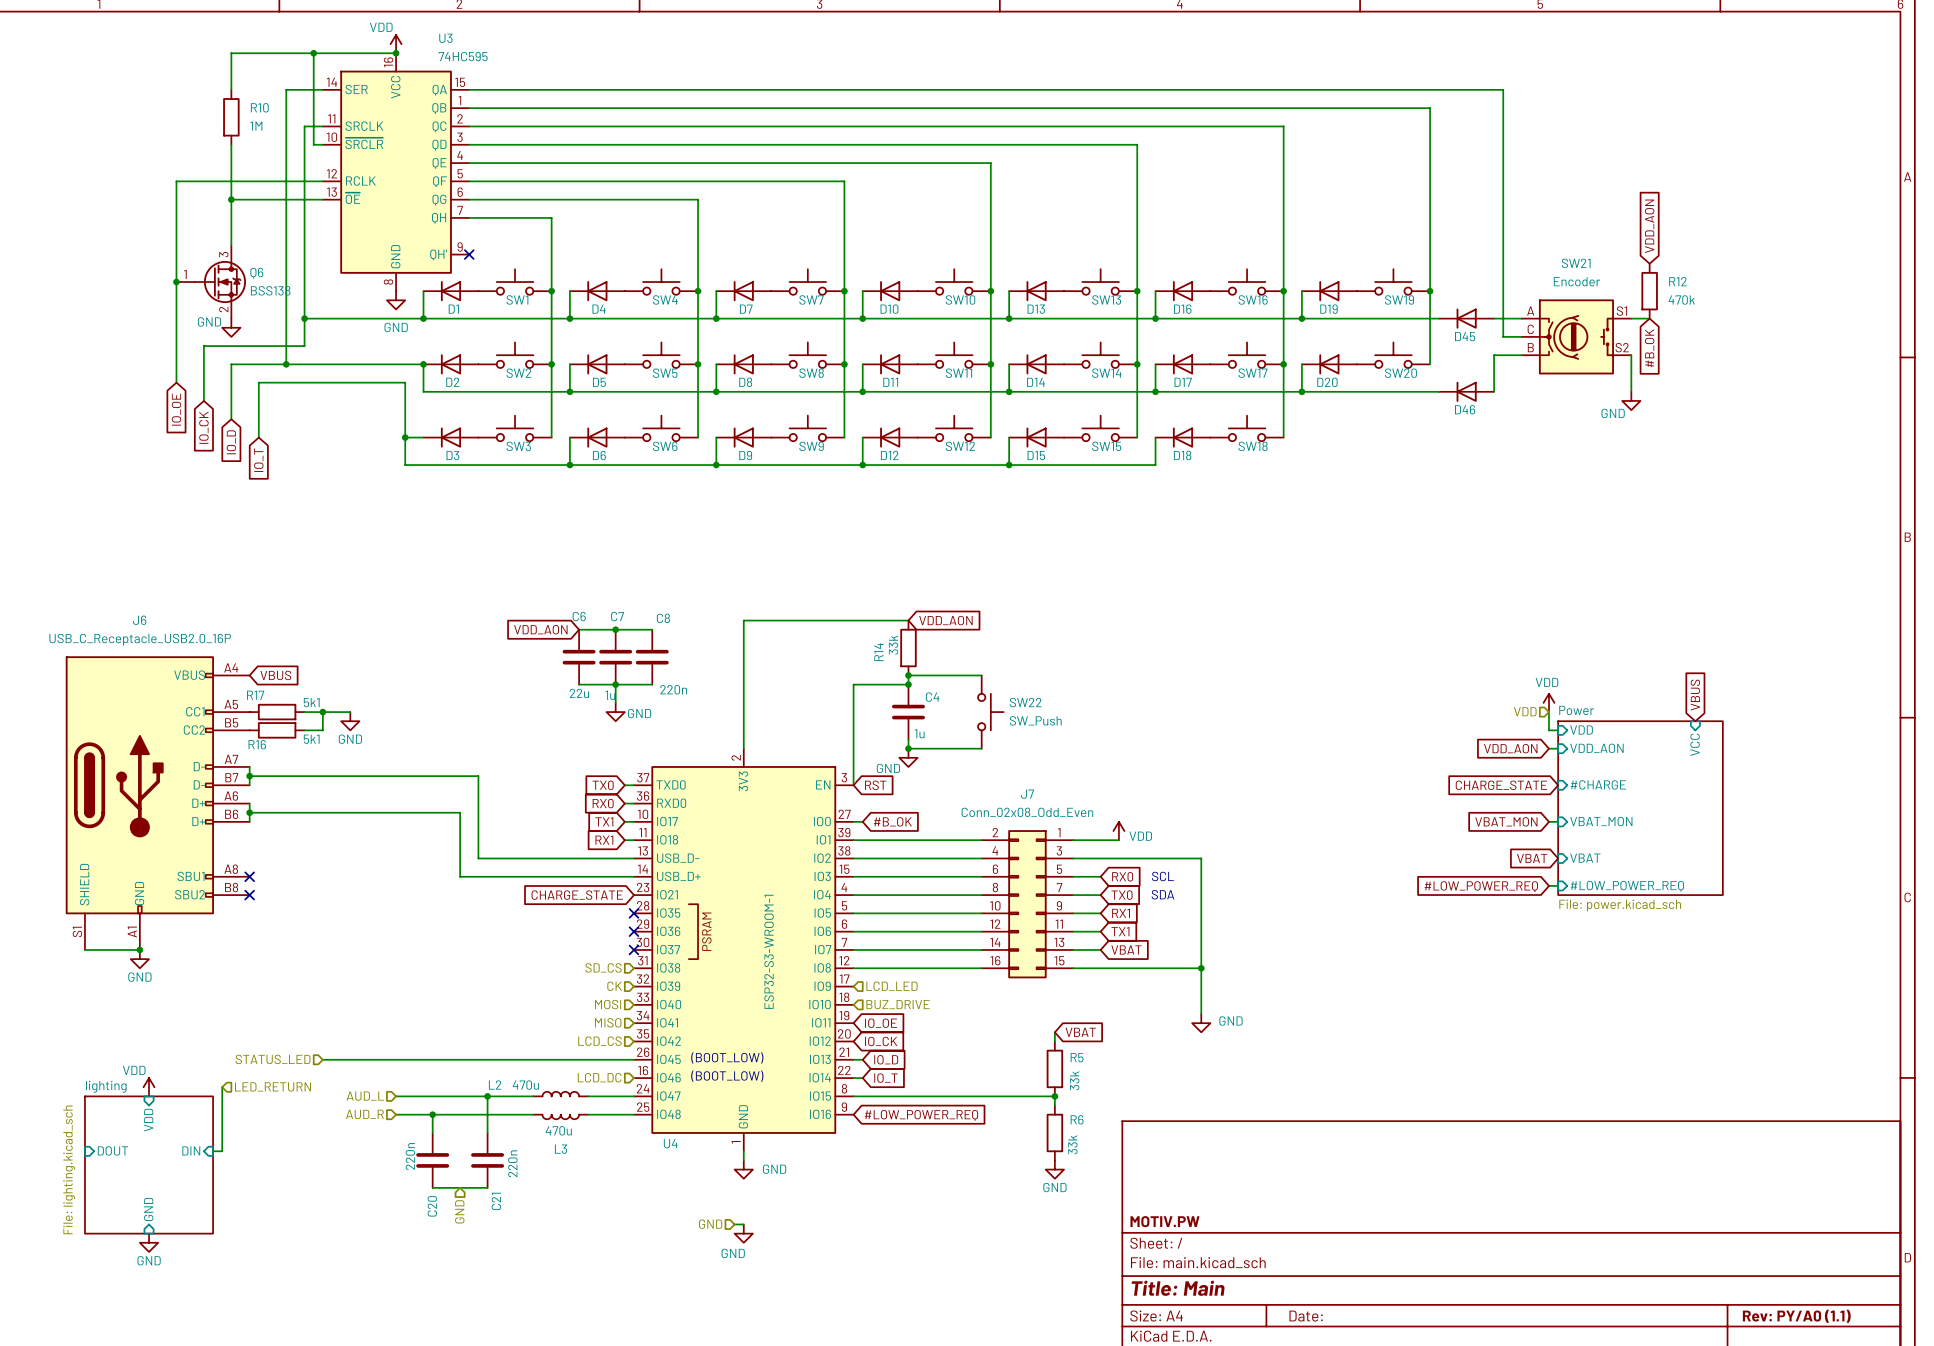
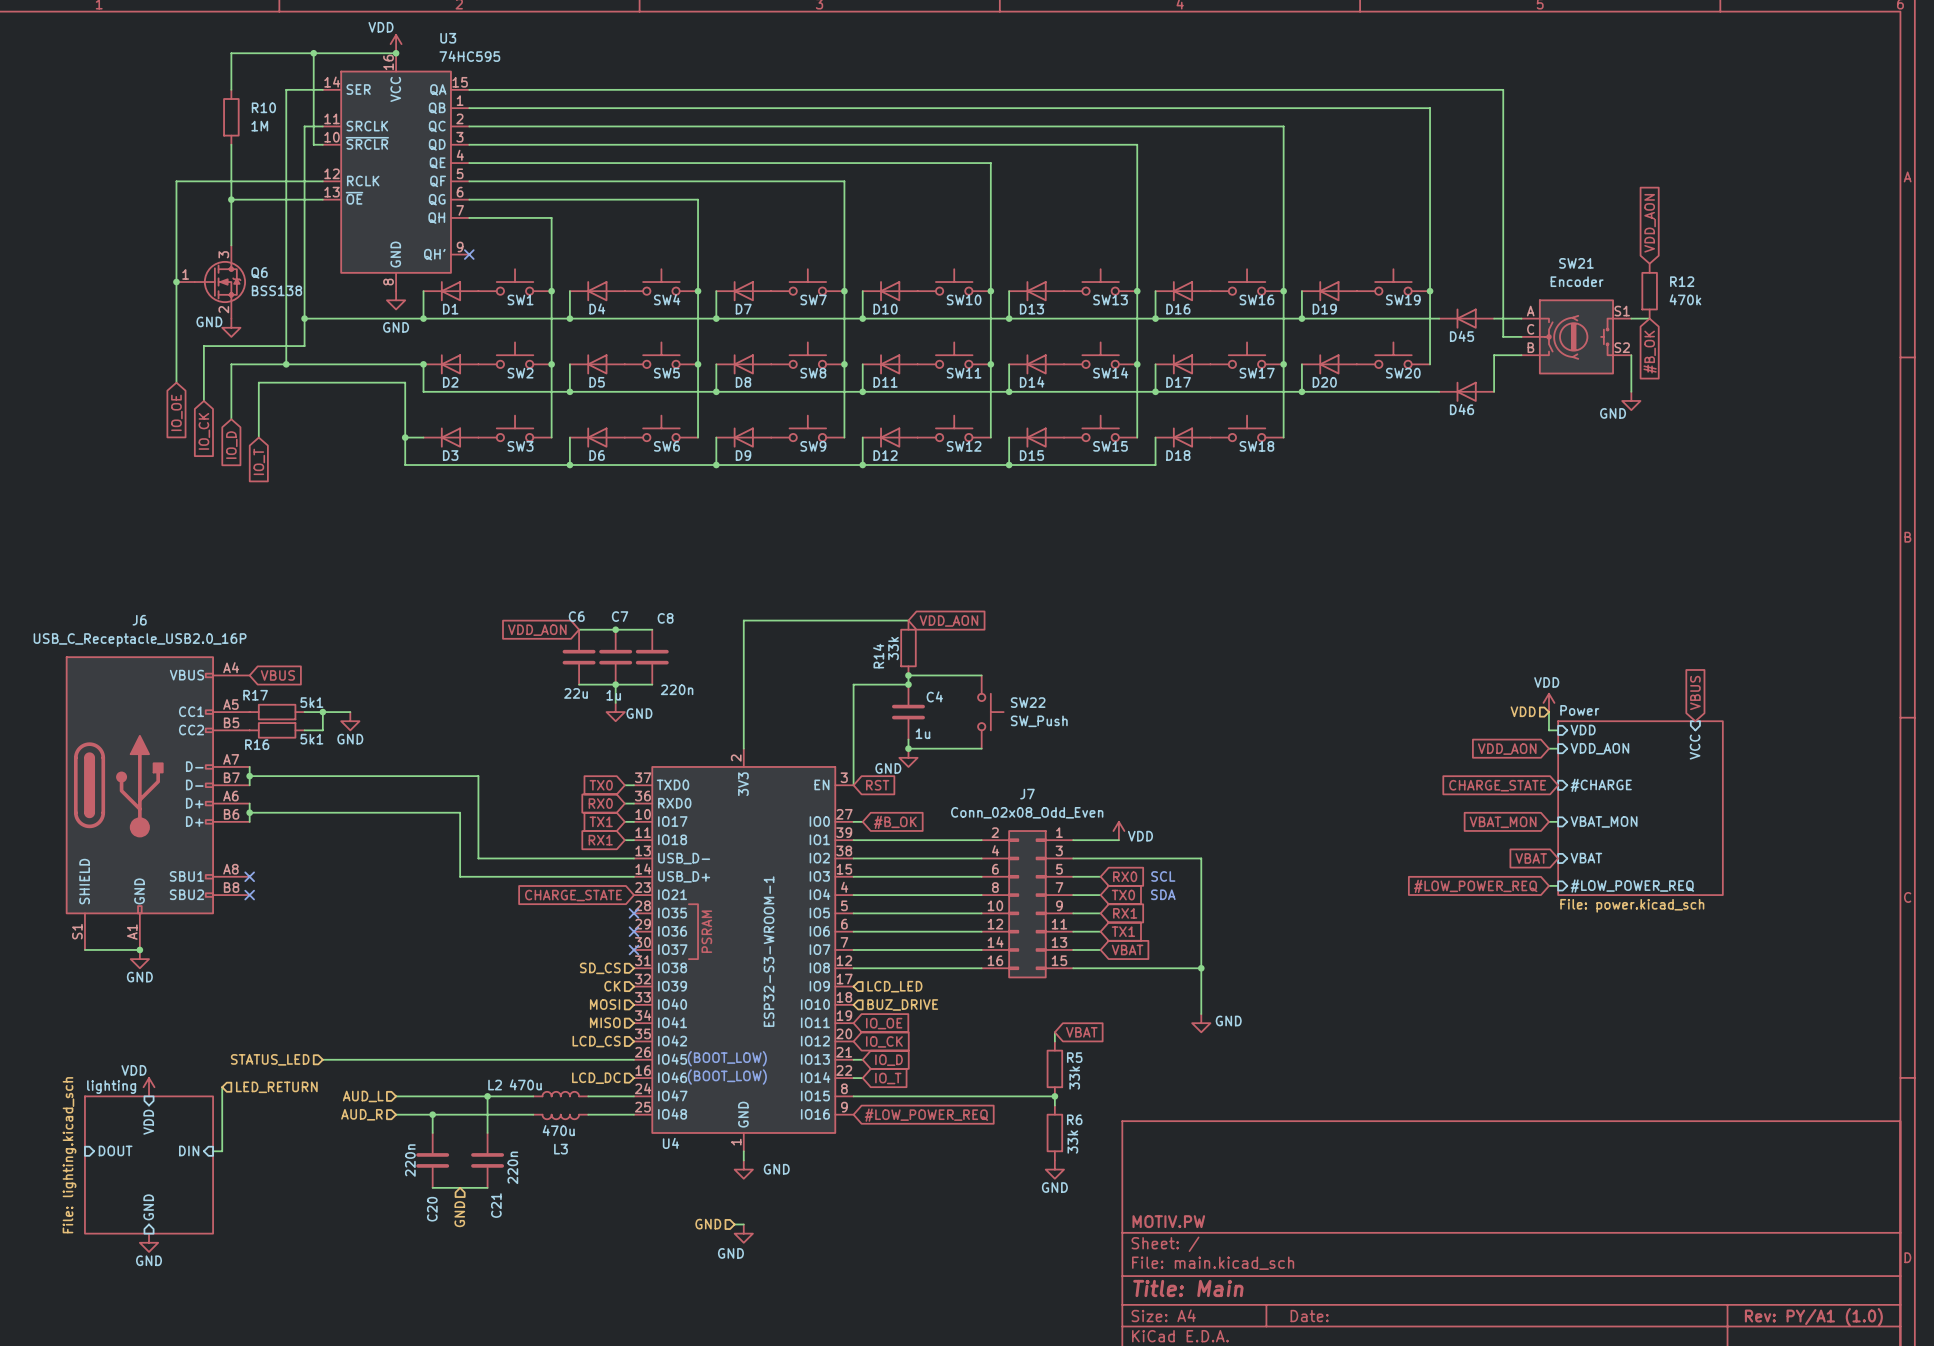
title block: Rev: PY/A0 (1.1) (1796, 1316) -> Rev: PY/A1 (1.0) (1813, 1317)

